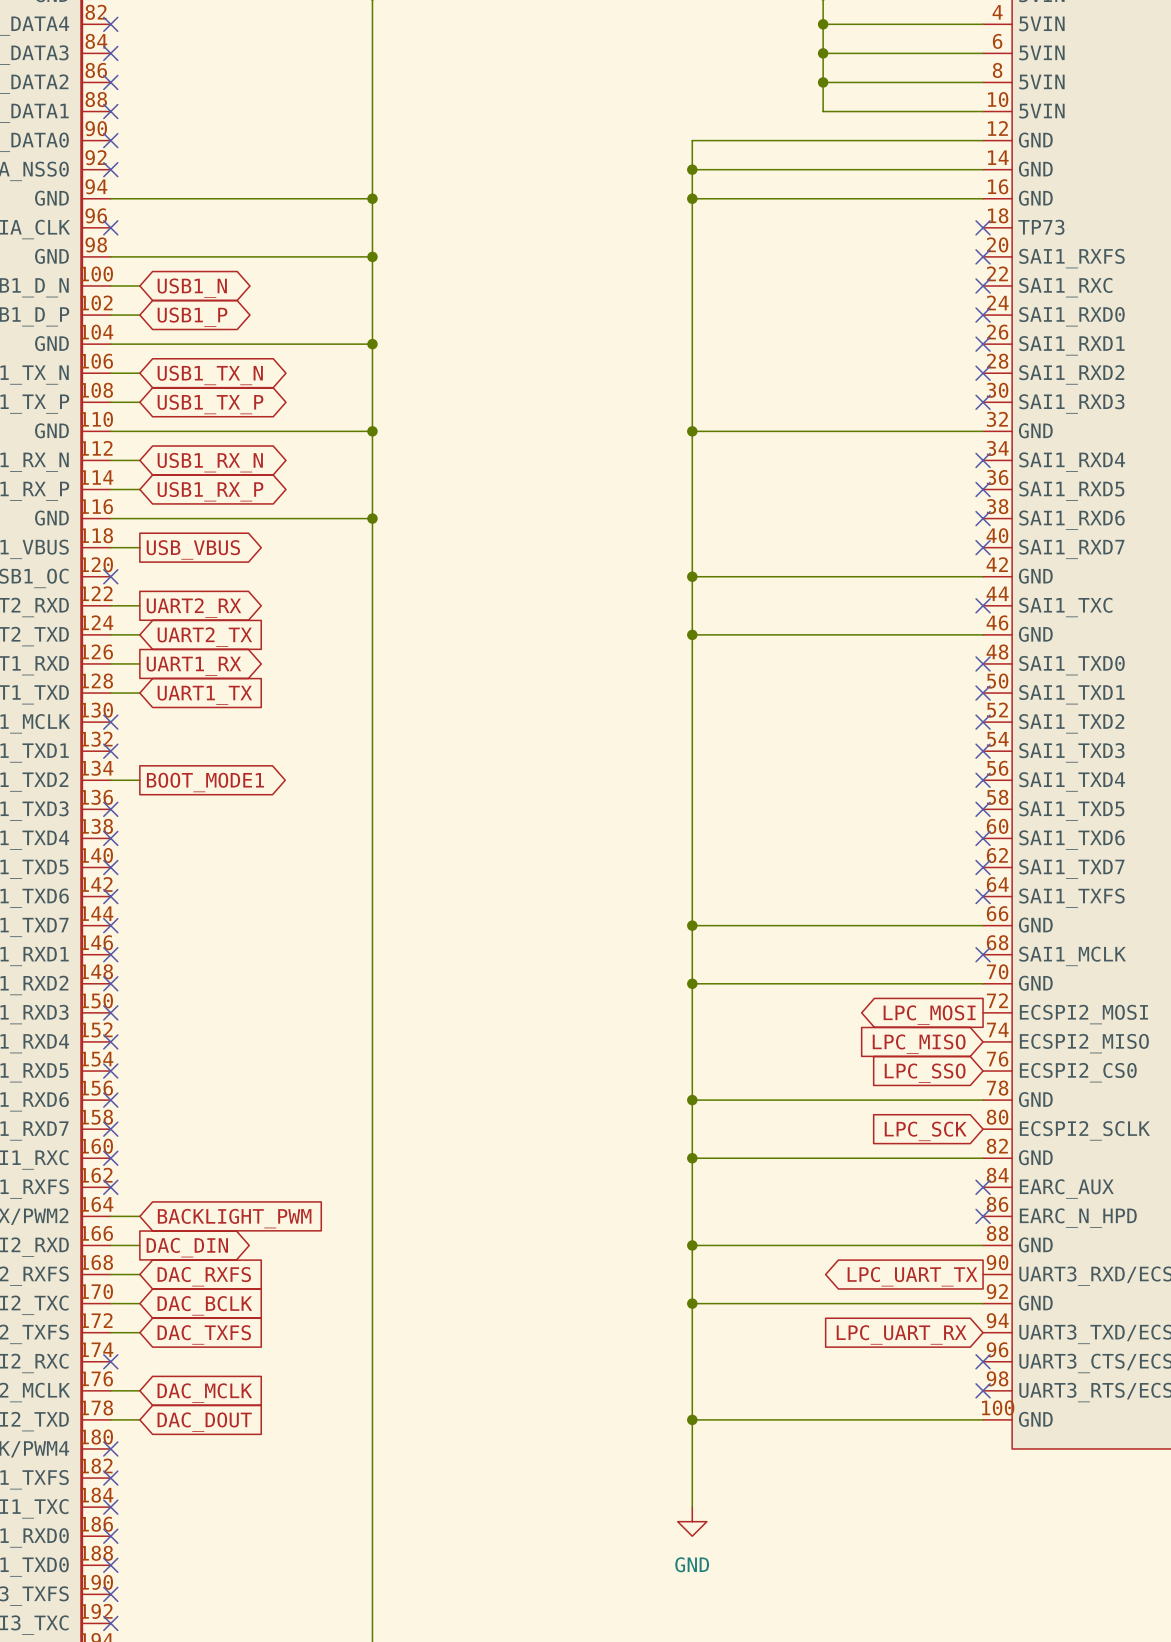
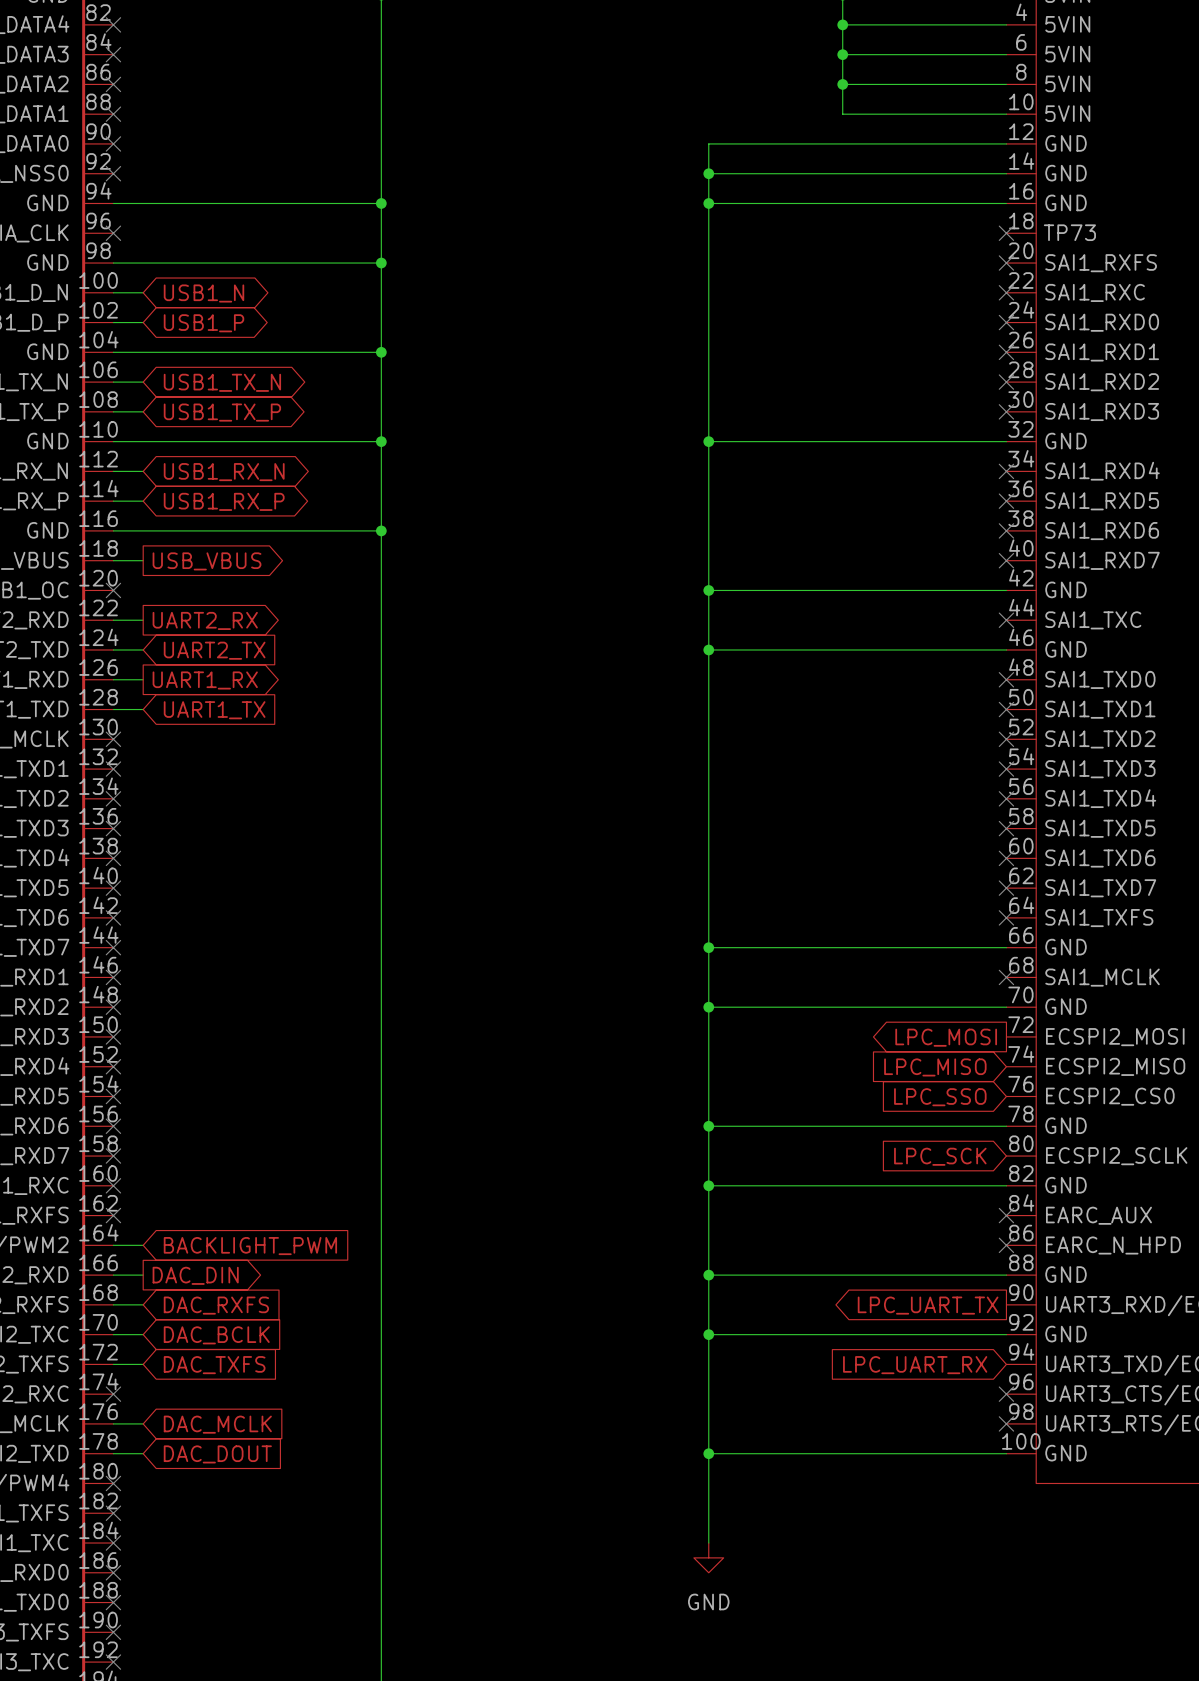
wire: (110, 780) (139, 780) -> none
no-connect mark: none -> (113, 798)
global label: BOOT_MODE1 (205, 782) -> none

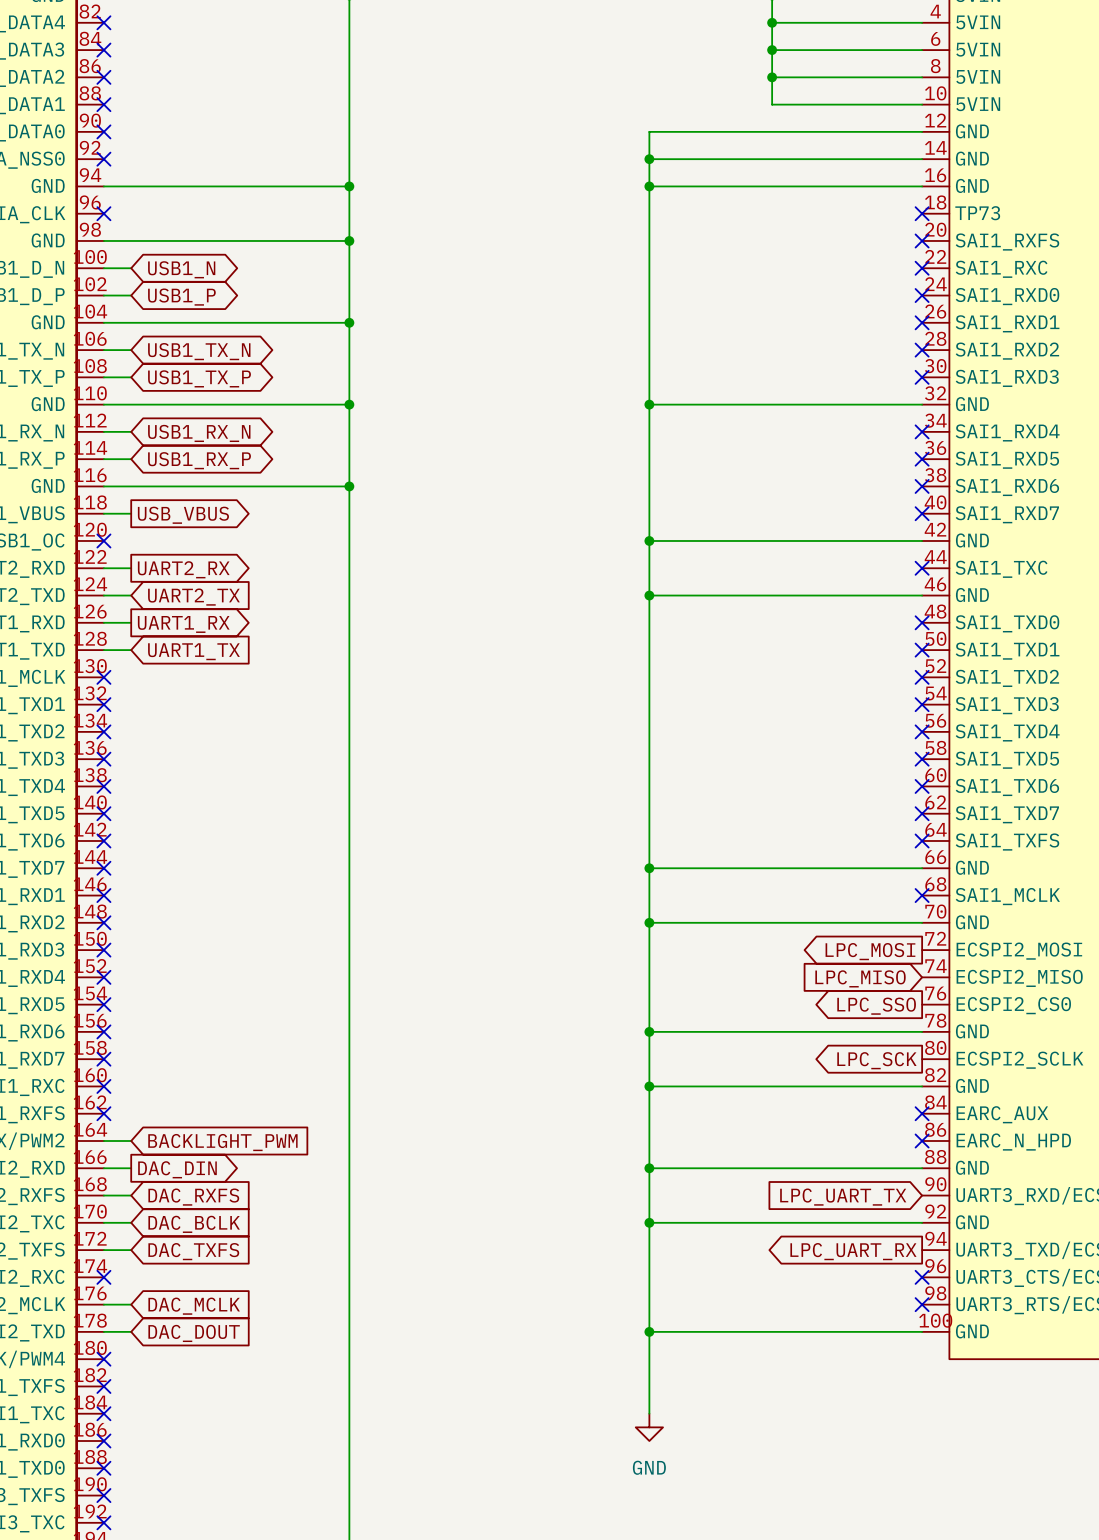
global label shape: input (940, 1097) -> output (876, 1006)
global label shape: input (940, 1156) -> output (876, 1060)
global label shape: output (928, 1305) -> input (843, 1197)
global label shape: input (915, 1365) -> output (853, 1251)

